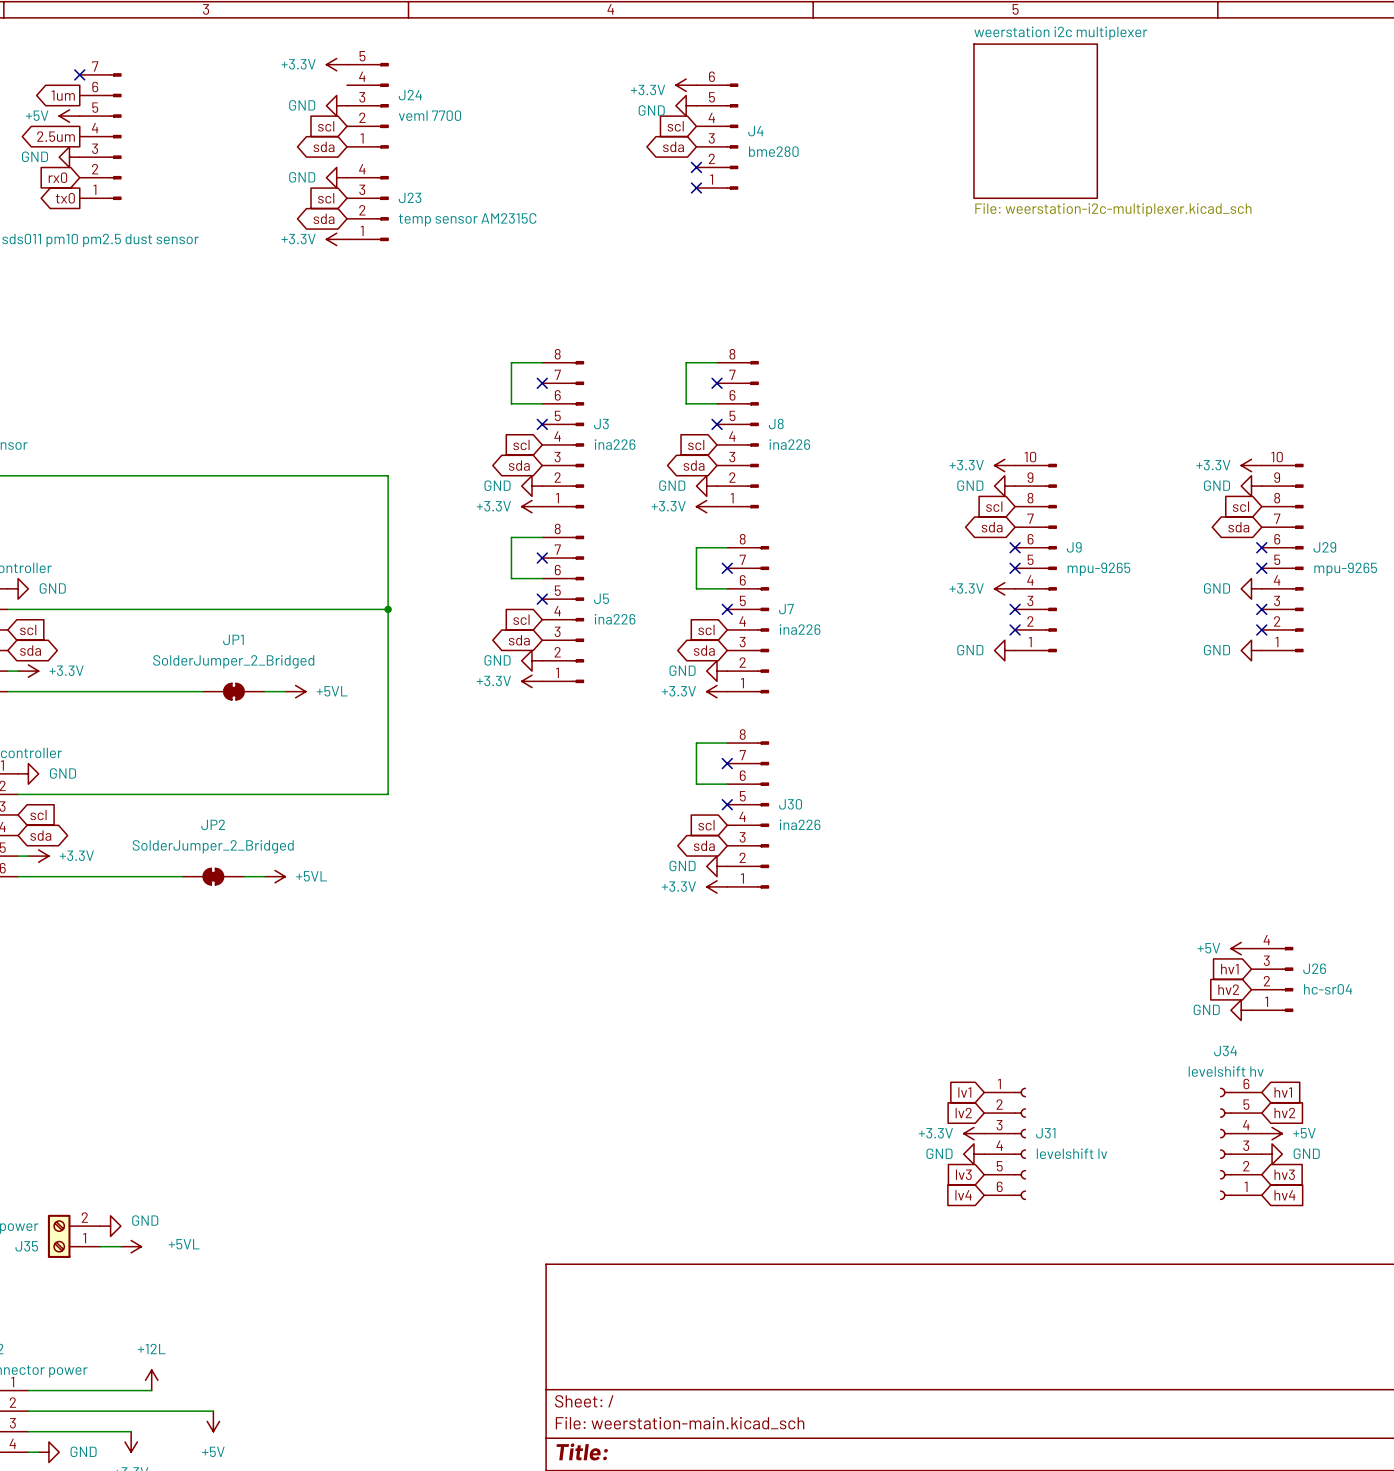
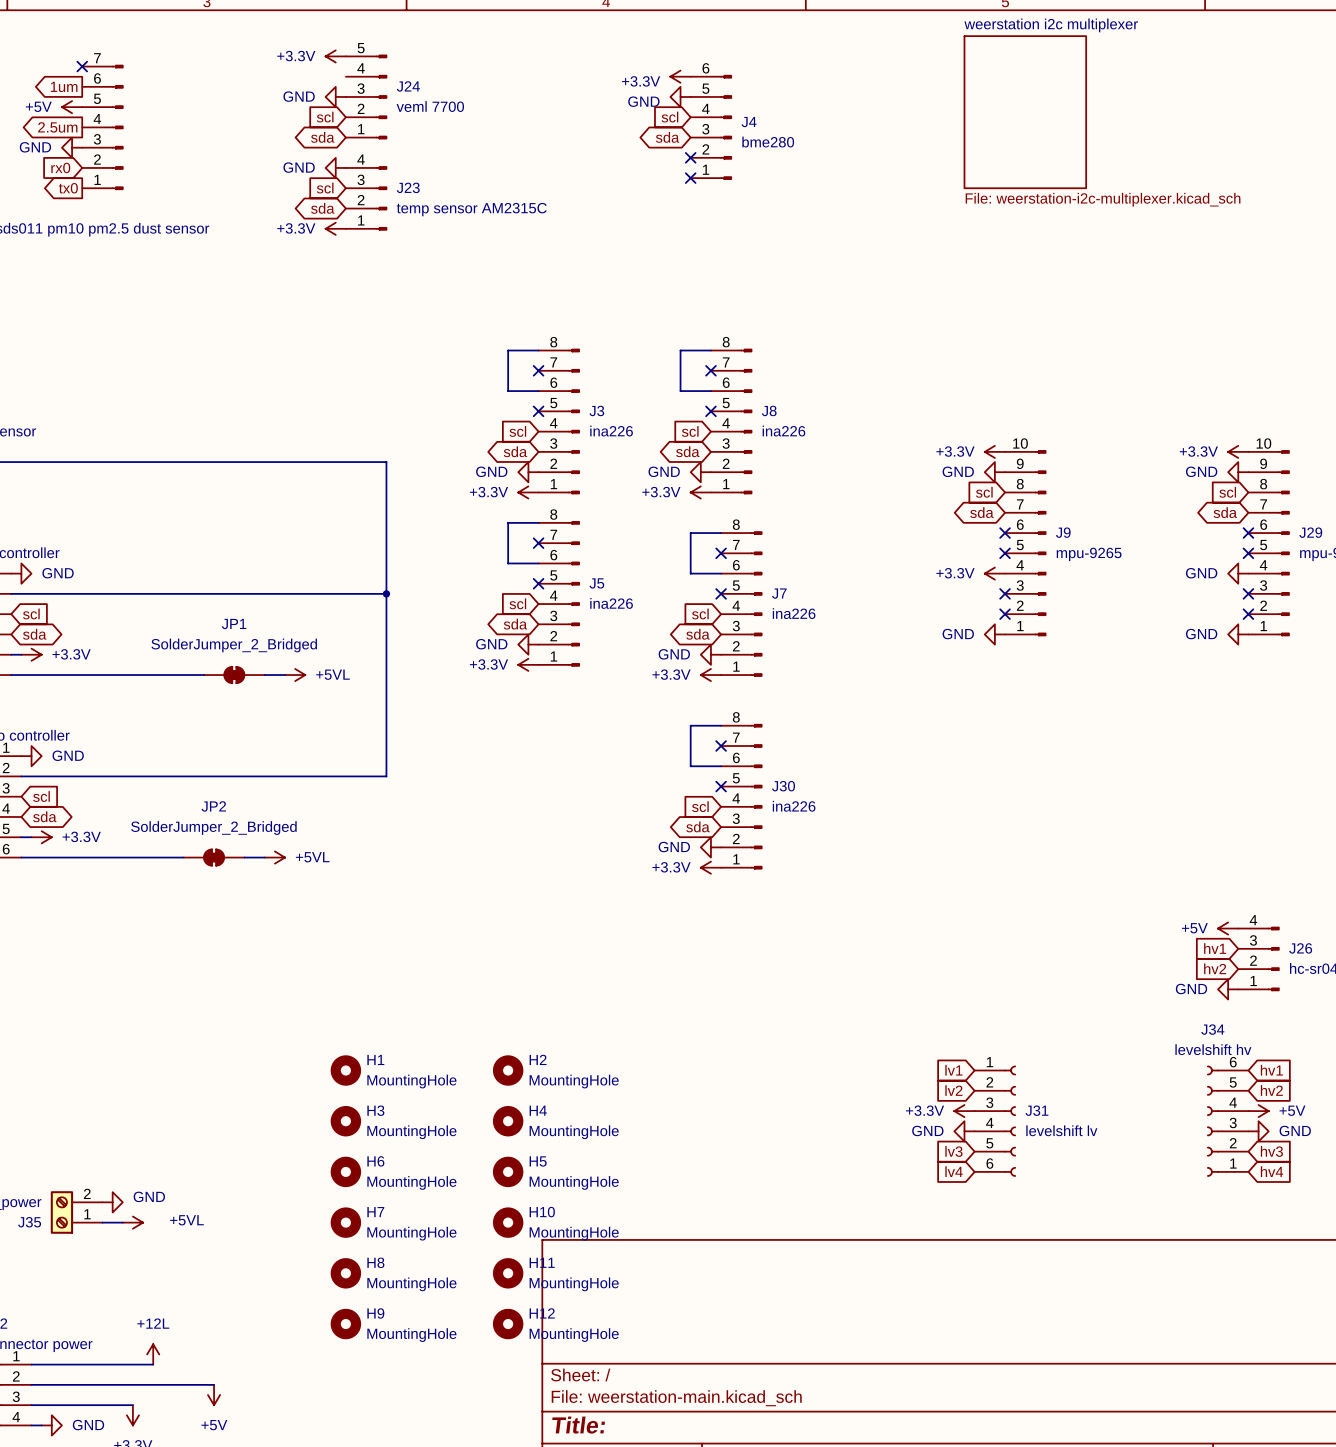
H1: none -> MountingHole (345, 1070)
H2: none -> MountingHole (508, 1070)
H3: none -> MountingHole (345, 1121)
H4: none -> MountingHole (508, 1121)
H6: none -> MountingHole (345, 1171)
H5: none -> MountingHole (508, 1171)
H7: none -> MountingHole (345, 1222)
H10: none -> MountingHole (508, 1222)
H8: none -> MountingHole (345, 1273)
H11: none -> MountingHole (508, 1273)
H9: none -> MountingHole (345, 1324)
H12: none -> MountingHole (508, 1324)

